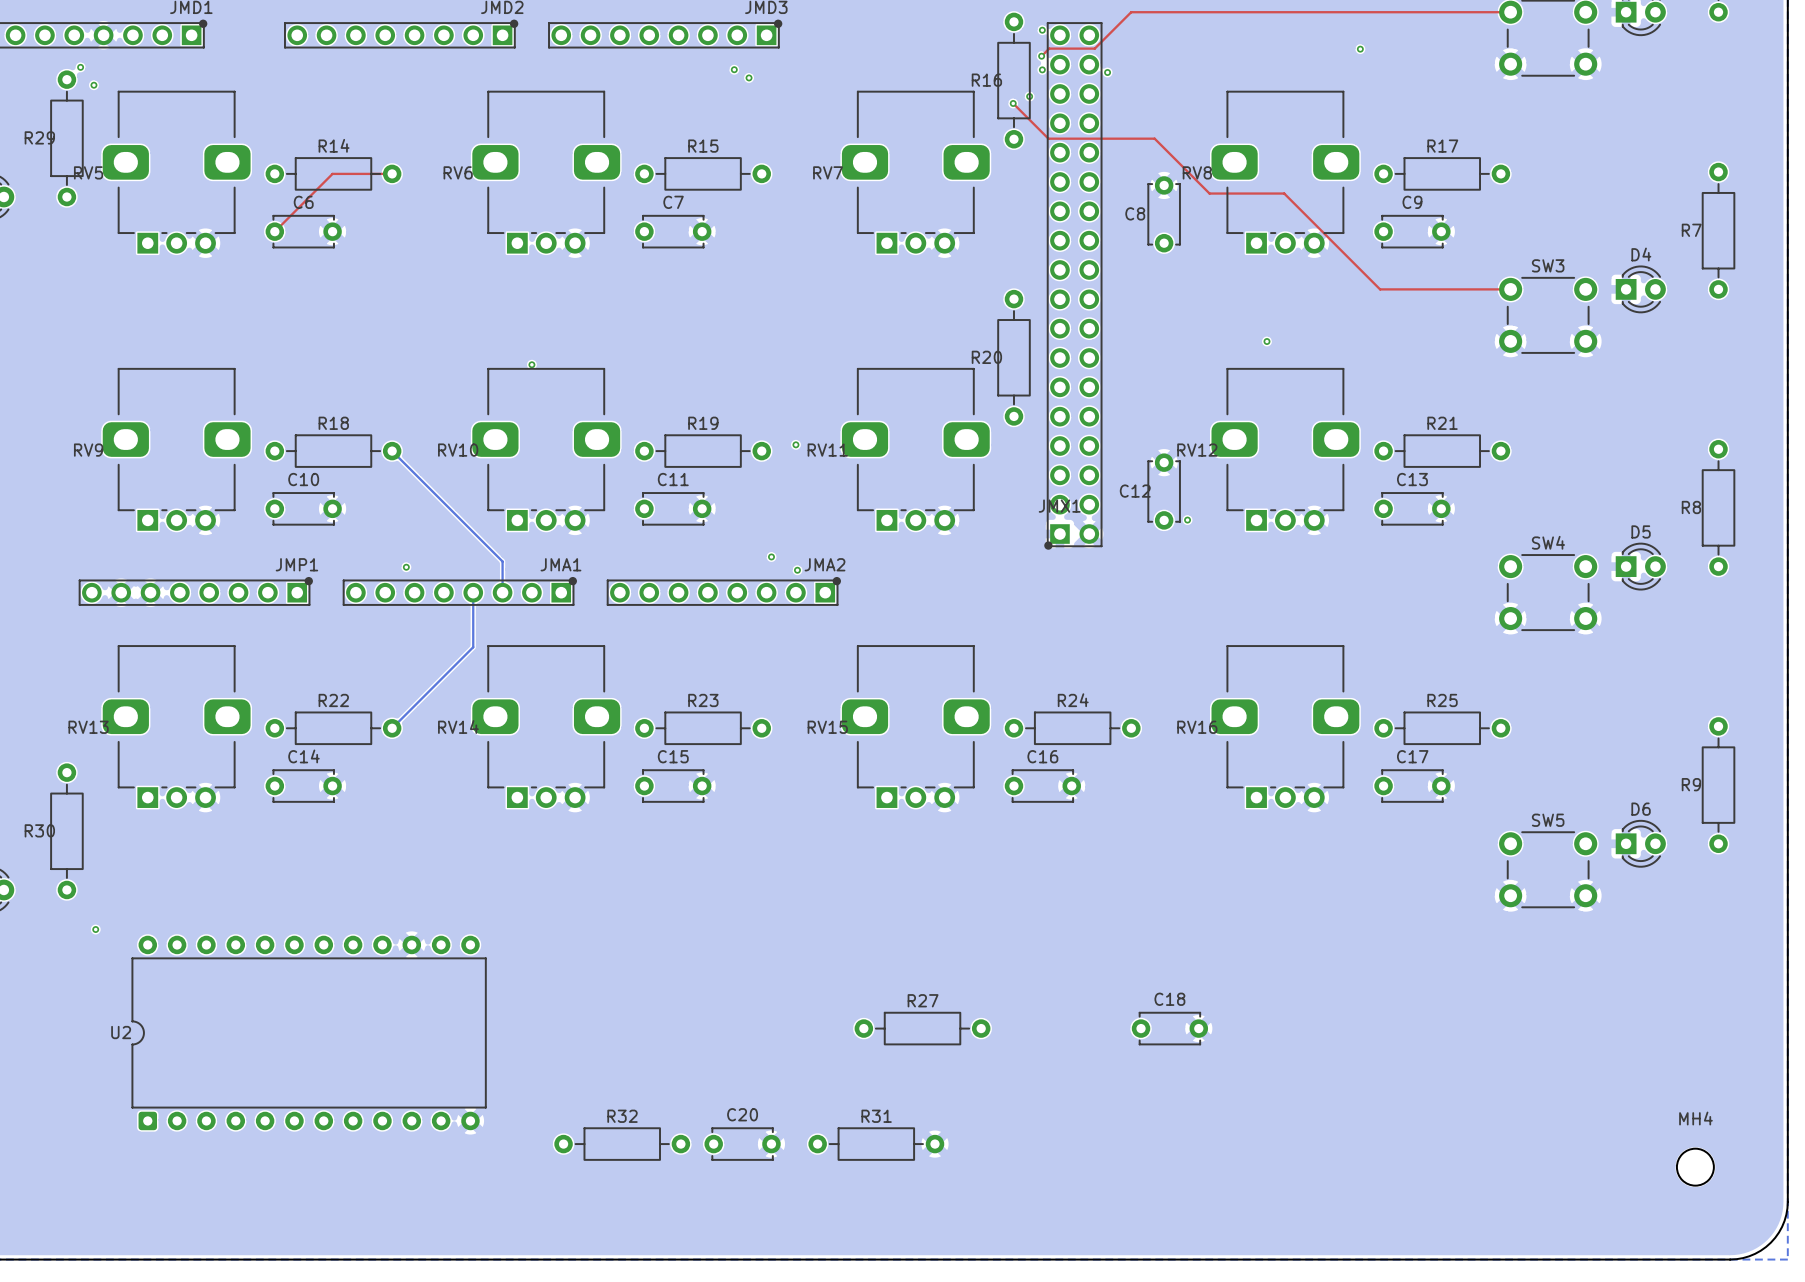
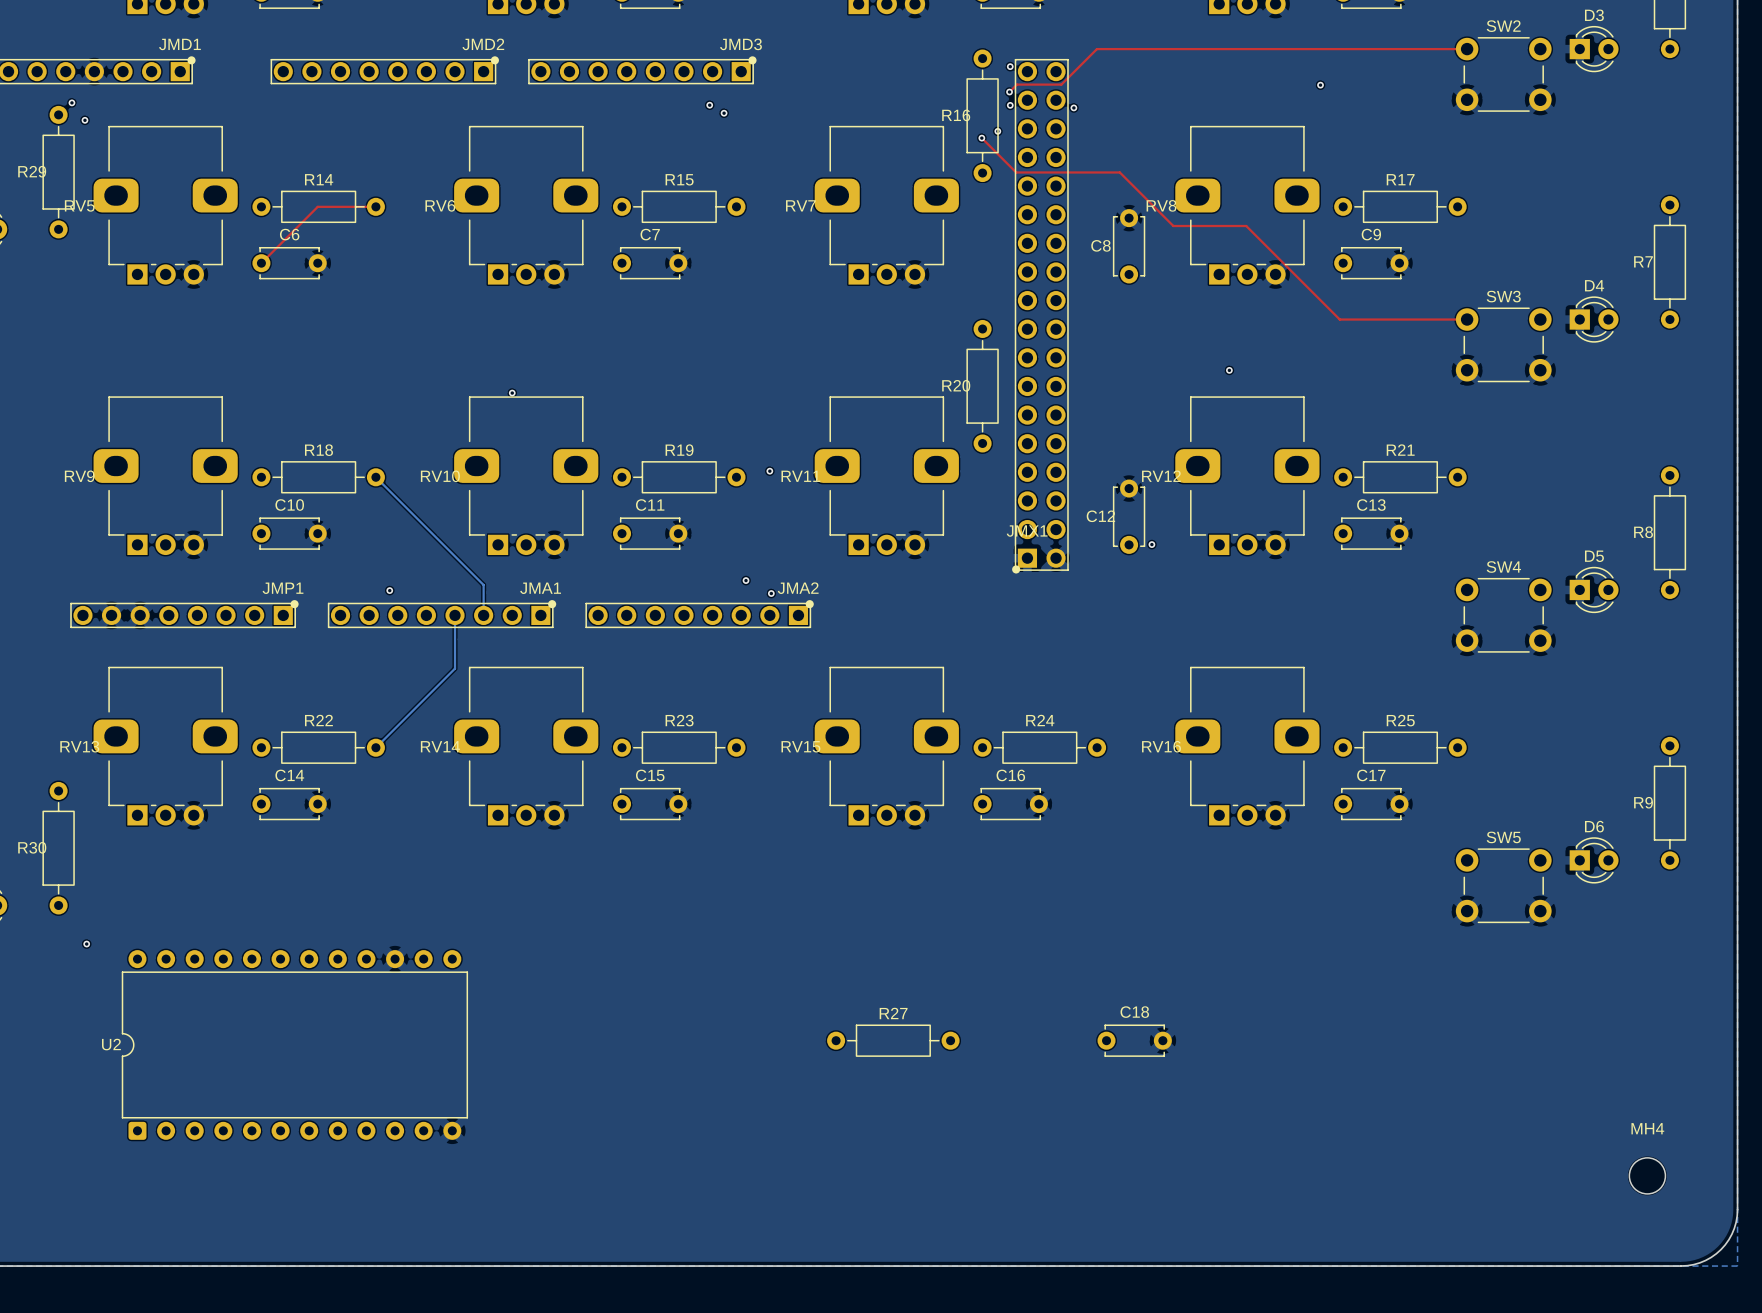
R32: (622, 1144) -> none
C20: (742, 1144) -> none
R31: (876, 1144) -> none

